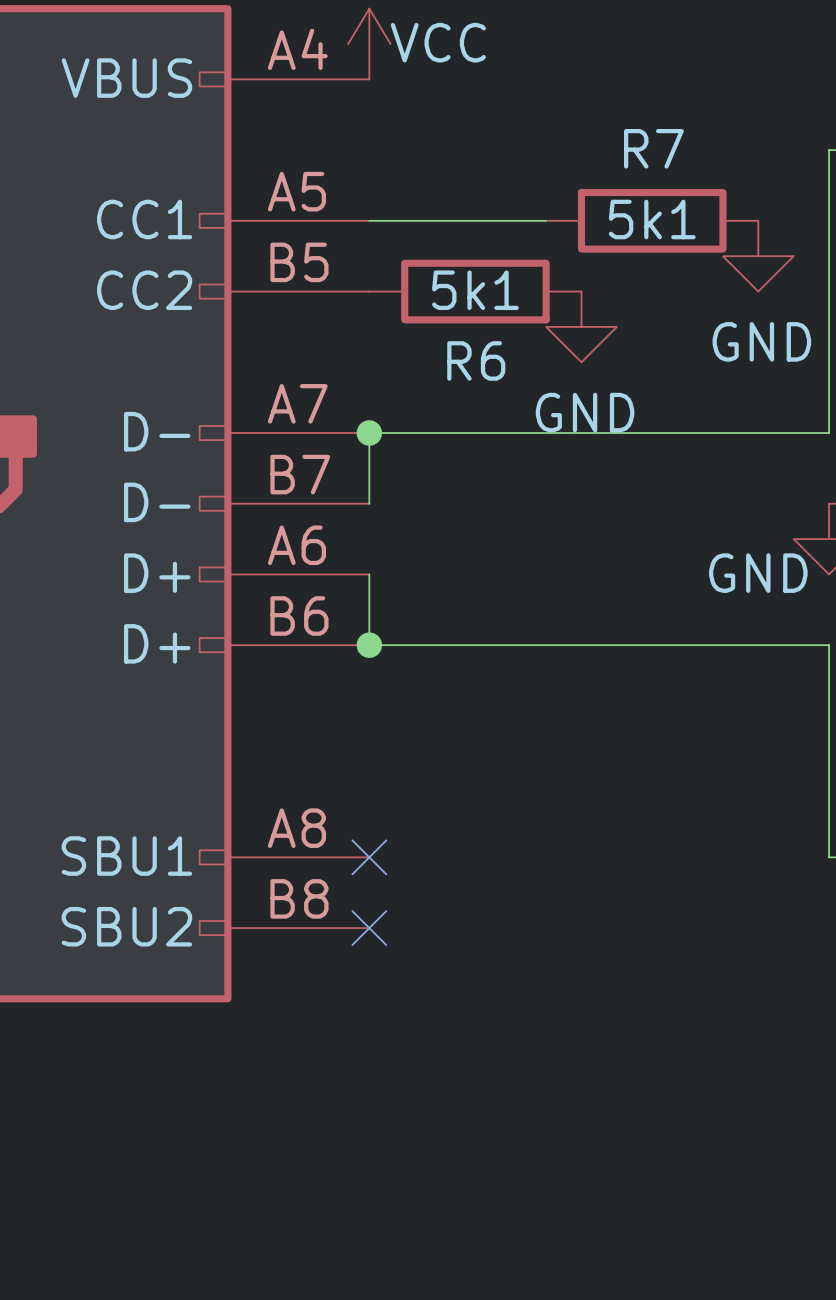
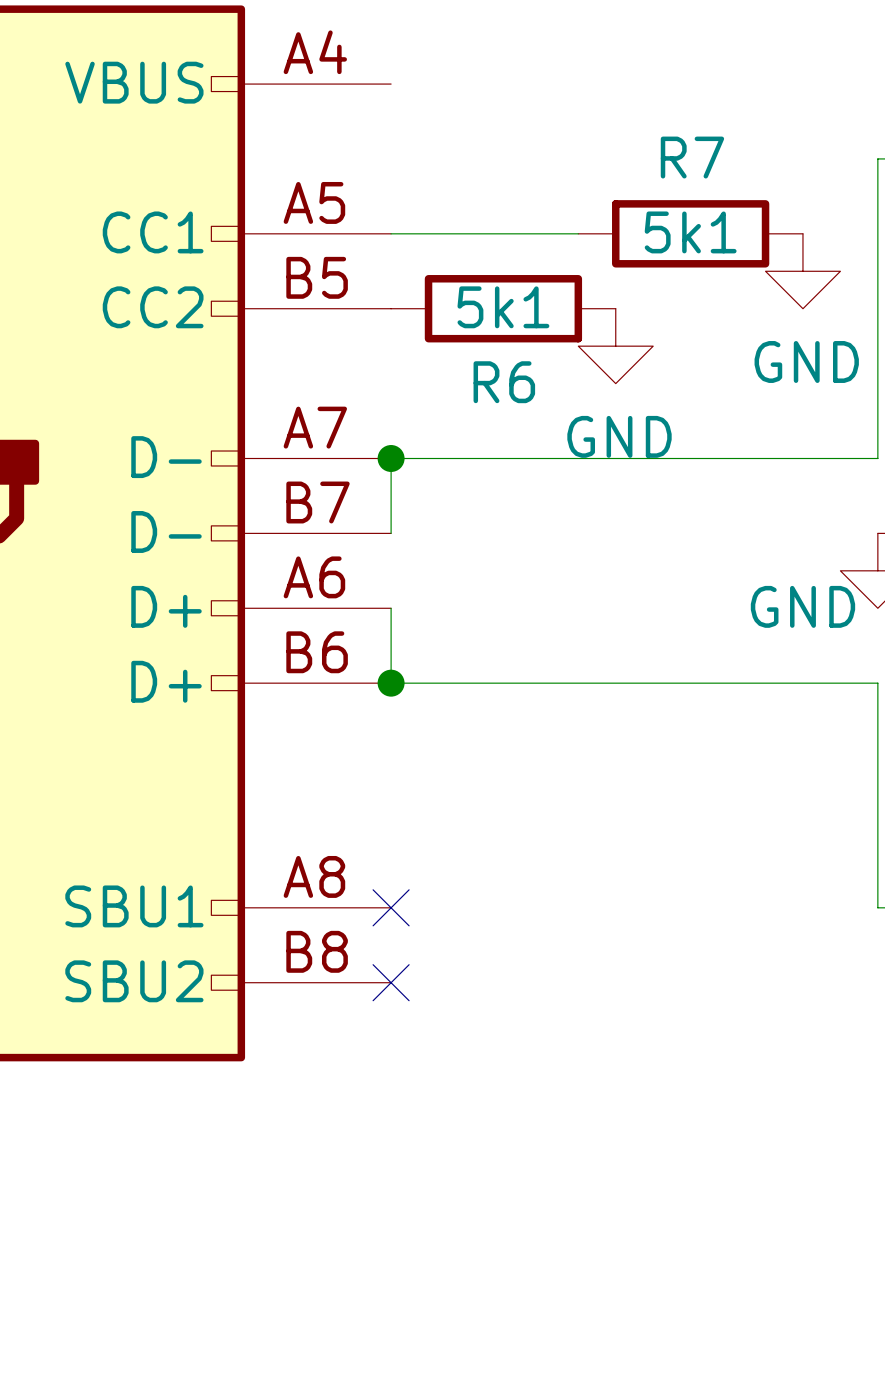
power symbol: VCC (369, 44) -> none

